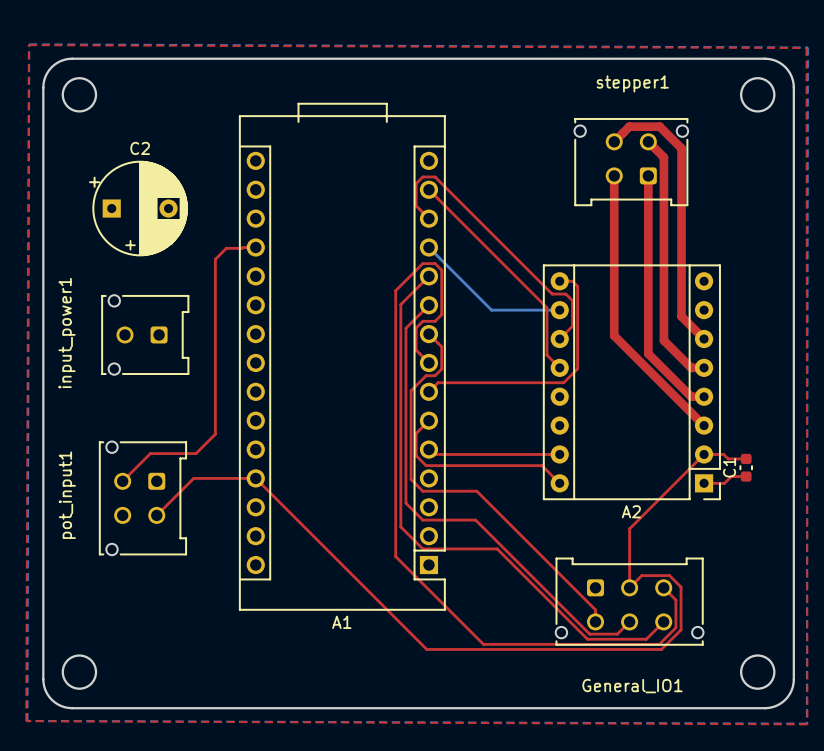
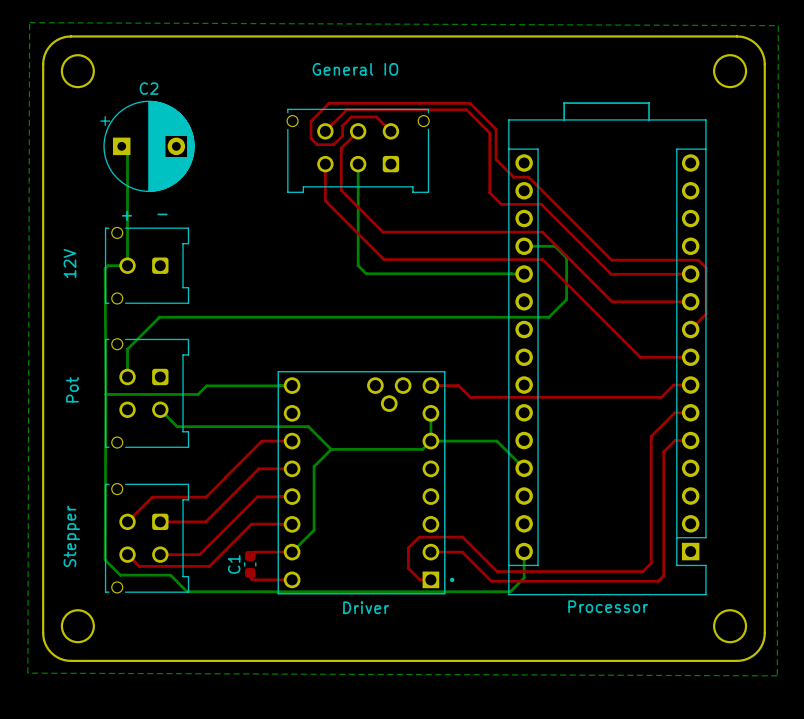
top zone outline: (28, 45) (26, 721) (807, 724) (806, 48) (28, 45) -> none
line: (298, 121) (298, 103) (386, 103) (386, 121) -> none
top track: (614, 141) (629, 126) (659, 126) (681, 148) (681, 316) (704, 339) -> none
top track: (648, 141) (663, 157) (663, 340) (691, 367) (704, 367) -> none
line: none -> (564, 120) (564, 103) (649, 103) (649, 120)
top track: none -> (325, 131) (346, 109) (466, 109) (489, 133) (489, 192) (501, 204) (541, 204) (611, 274) (690, 274)
top track: none -> (358, 131) (341, 148) (341, 190) (382, 232) (542, 232) (612, 301) (690, 301)
top track: none -> (390, 131) (376, 116) (351, 116) (342, 125) (342, 135) (333, 144) (317, 144) (311, 138) (311, 121) (329, 103) (470, 103) (496, 129) (496, 159) (513, 177) (528, 177) (611, 260) (698, 260) (706, 267) (706, 313) (690, 329)
stepper1: (631, 162) -> none
bottom track: none -> (121, 146) (127, 152) (127, 265) (108, 265) (105, 268) (105, 394)
top track: (614, 175) (614, 335) (704, 425) -> none
top track: (648, 175) (648, 353) (691, 396) (704, 396) -> none
General IO: none -> (358, 150)
top track: (428, 189) (546, 307) (546, 355) (559, 367) -> none
top track: none -> (325, 164) (325, 200) (383, 259) (542, 259) (640, 357) (690, 357)
bottom track: none -> (358, 164) (358, 265) (366, 273) (524, 274)
C2 position: (138, 208) -> (147, 146)
top track: (428, 218) (416, 205) (416, 183) (422, 176) (435, 176) (552, 294) (565, 294) (572, 300) (572, 326) (559, 339) -> none
top track: (255, 247) (226, 248) (215, 259) (215, 434) (196, 453) (150, 453) (122, 481) -> none
bottom track: (428, 247) (491, 310) (559, 310) -> none
top track: (428, 276) (400, 304) (400, 526) (422, 548) (497, 548) (587, 639) (646, 639) (663, 621) -> none
bottom track: none -> (524, 246) (554, 246) (566, 257) (566, 299) (548, 317) (159, 317) (127, 349) (127, 376)
top track: (559, 281) (572, 281) (577, 286) (577, 368) (563, 382) (438, 382) (428, 391) -> none
12V: none -> (147, 265)
top track: (428, 305) (405, 328) (405, 503) (422, 520) (475, 520) (589, 634) (617, 634) (629, 621) -> none
input_power1: (145, 334) -> none
top track: (428, 334) (441, 346) (441, 369) (435, 375) (426, 375) (411, 390) (411, 479) (422, 491) (476, 491) (595, 609) (595, 621) -> none
A1: (342, 362) -> none
top track: (428, 362) (416, 350) (416, 327) (422, 321) (435, 321) (441, 314) (441, 270) (435, 263) (422, 263) (395, 290) (395, 556) (483, 644) (659, 644) (675, 627) (675, 600) (663, 587) -> none
A2: (631, 382) -> none
Processor: none -> (607, 357)
top track: (428, 420) (416, 433) (416, 455) (426, 465) (542, 465) (559, 483) -> none
bottom track: none -> (292, 385) (206, 385) (198, 394) (105, 394)
top track: none -> (690, 385) (673, 385) (661, 397) (470, 397) (458, 385) (430, 385)
Pot: none -> (147, 393)
bottom track: none -> (105, 394) (105, 559) (120, 575) (170, 575) (187, 591) (510, 591) (524, 577) (524, 551)
bottom track: none -> (160, 409) (177, 426) (308, 426) (331, 449)
top track: (428, 449) (433, 454) (559, 454) -> none
bottom track: none -> (430, 413) (430, 441)
top track: none -> (690, 412) (674, 412) (651, 436) (651, 563) (642, 571) (497, 571) (462, 537) (419, 537) (408, 547) (408, 568) (419, 579) (430, 579)
top track: (746, 458) (728, 458) (723, 454) (704, 454) (629, 528) (629, 587) (641, 575) (669, 575) (681, 587) (681, 629) (661, 649) (426, 649) (255, 478) (193, 478) (156, 515) -> none
C1 position: (746, 467) -> (250, 564)
top track: (746, 476) (731, 476) (724, 483) (704, 483) -> none
top track: none -> (292, 441) (261, 441) (206, 497) (152, 497) (127, 521)
bottom track: none -> (430, 441) (496, 441) (524, 468)
bottom track: none -> (430, 441) (422, 449) (331, 449)
top track: none -> (690, 440) (675, 440) (663, 451) (663, 575) (658, 581) (491, 581) (462, 552) (430, 552)
bottom track: none -> (331, 449) (314, 466) (314, 530) (292, 552)
pot_input1: (142, 498) -> none
top track: none -> (292, 468) (258, 468) (205, 521) (160, 521)
Driver: none -> (365, 482)
top track: none -> (292, 496) (257, 496) (199, 554) (160, 554)
top track: none -> (292, 524) (251, 524) (209, 566) (139, 566) (127, 554)
Stepper: none -> (147, 538)
top track: none -> (292, 552) (254, 552) (250, 555)
General_IO1: (629, 601) -> none
top track: none -> (250, 572) (252, 579) (292, 579)

